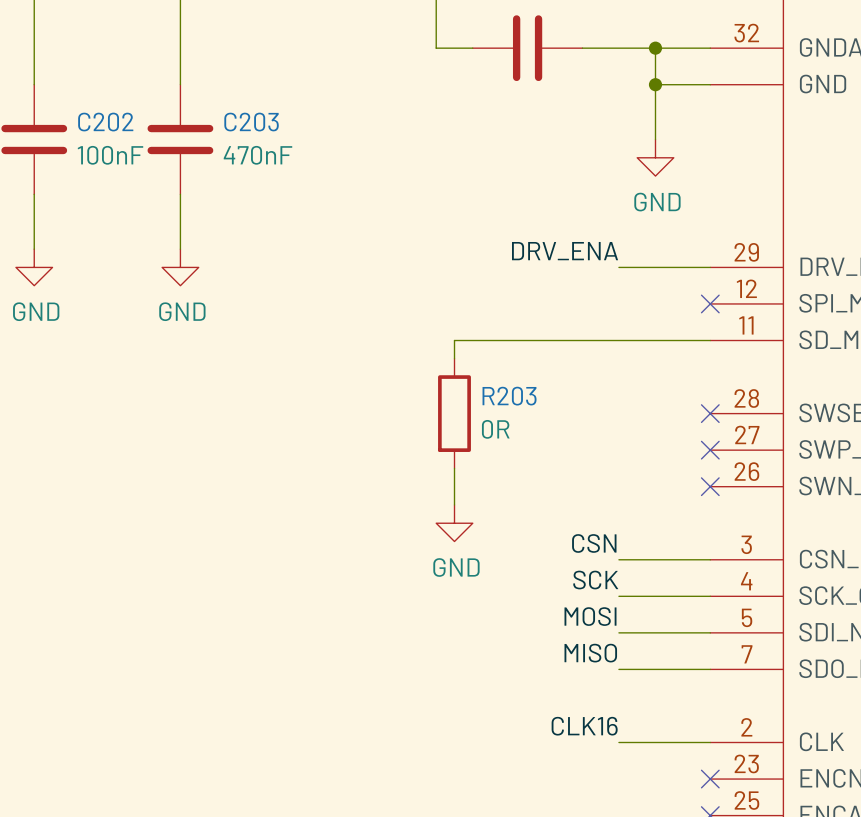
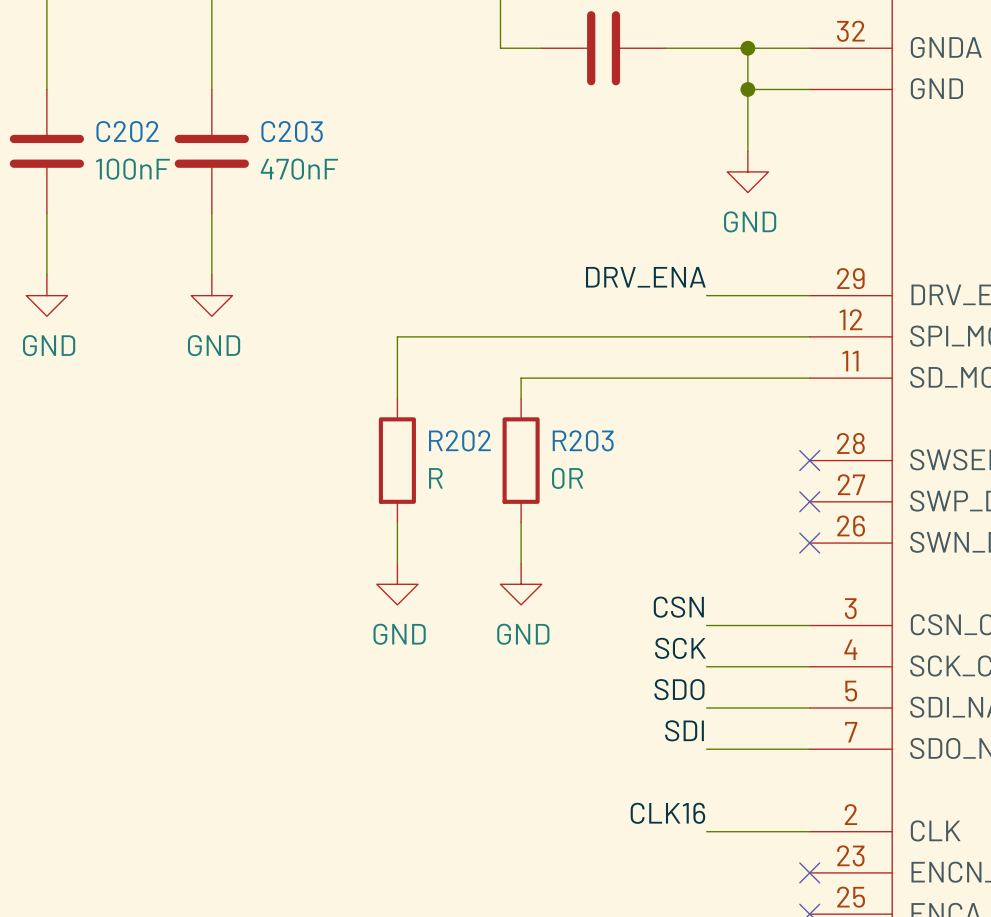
wire: none -> (809, 336) (397, 336) (397, 398)
no-connect mark: (710, 303) -> none
R202: none -> R (397, 460)
wire: none -> (397, 522) (397, 563)
power symbol: none -> GND (397, 584)
label: MOSI (590, 616) -> SDO (679, 689)
label: MISO (590, 653) -> SDI (684, 730)

